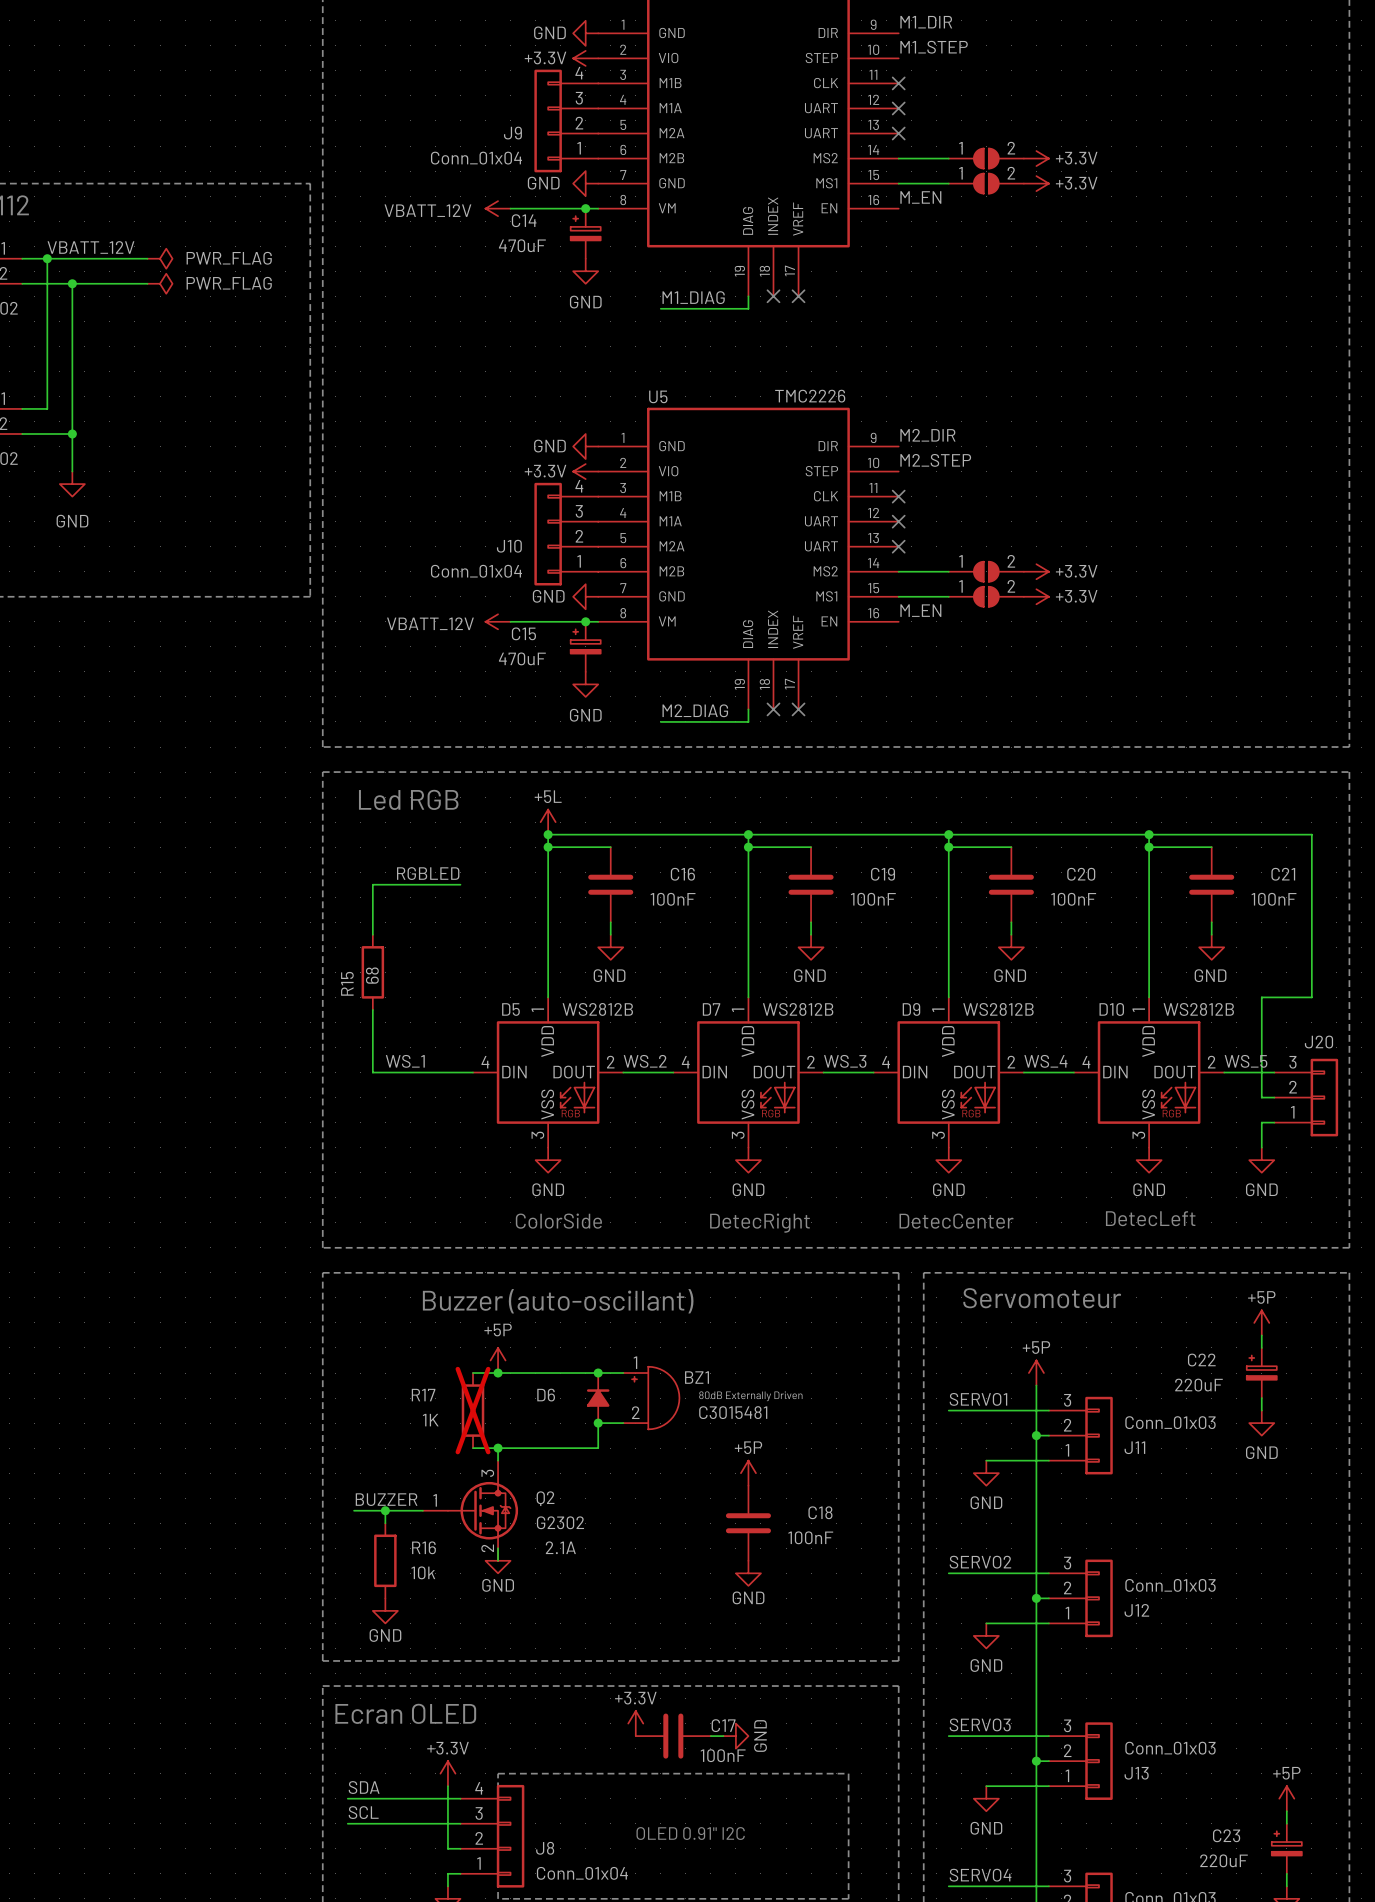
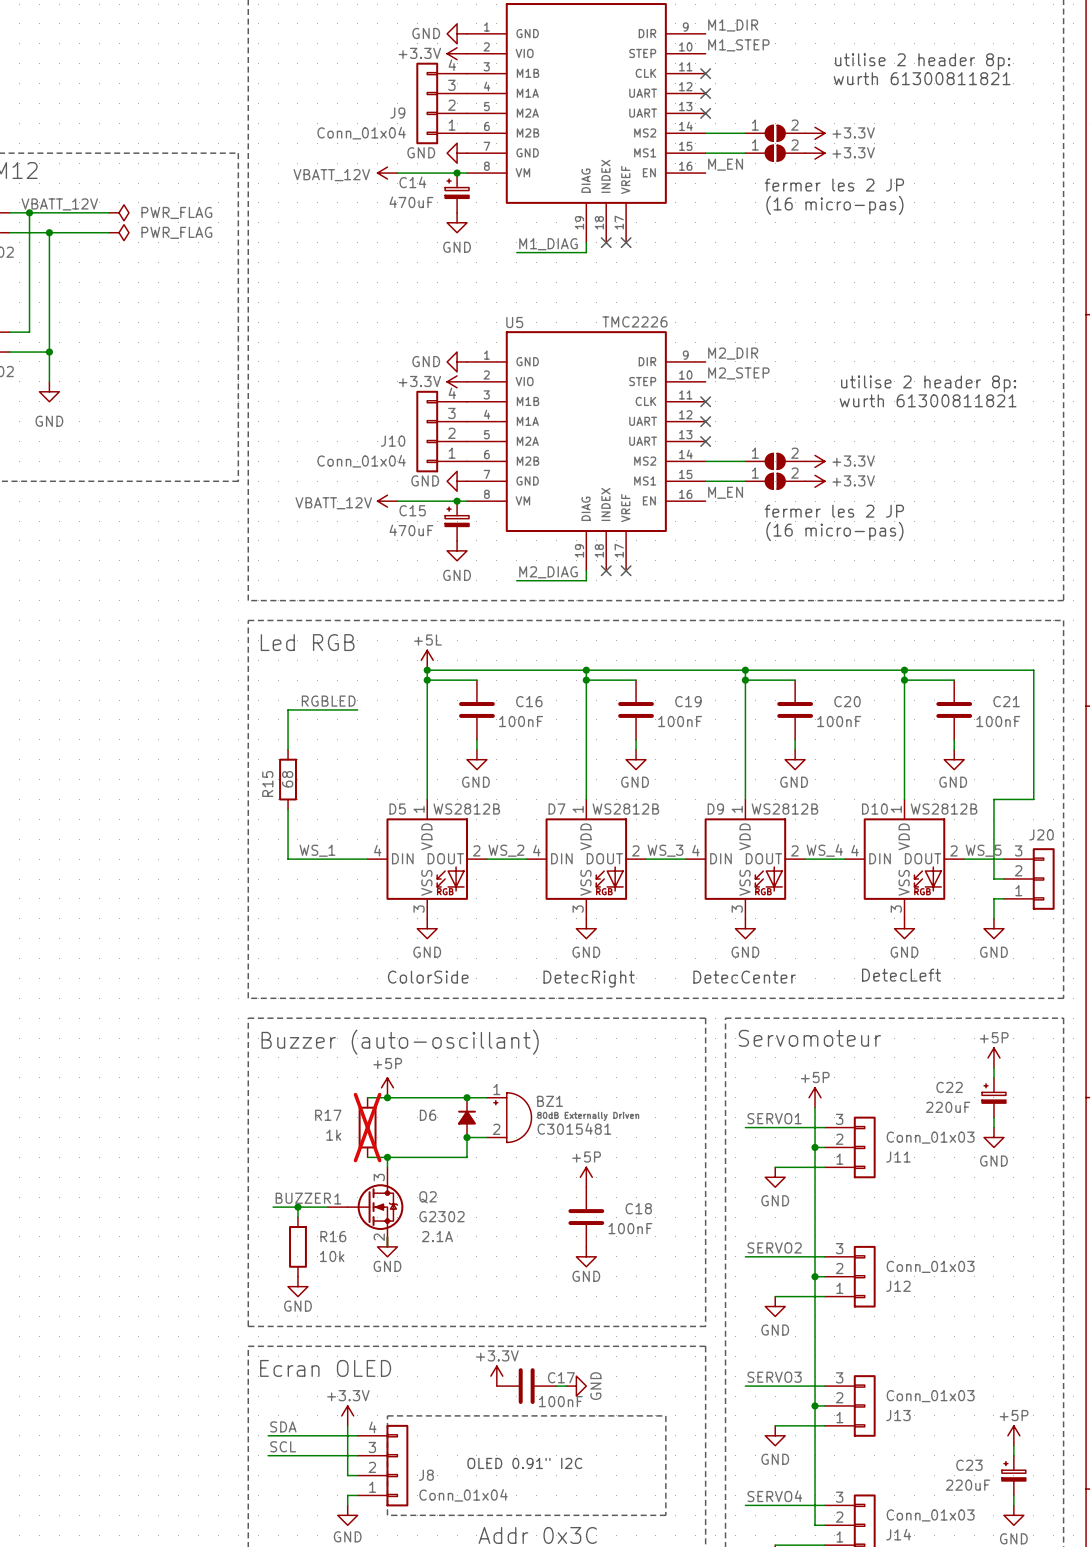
text: none -> utilise 2 header 8p: (922, 61)
text: none -> wurth 61300811821 (922, 78)
text: none -> fermer les 2 JP (834, 185)
text: none -> (16 micro-pas) (834, 205)
text: none -> utilise 2 header 8p: (928, 383)
text: none -> wurth 61300811821 (928, 400)
text: none -> fermer les 2 JP (834, 511)
text: none -> (16 micro-pas) (834, 531)
R17 value: 1K (430, 1420) -> 1k (333, 1135)

